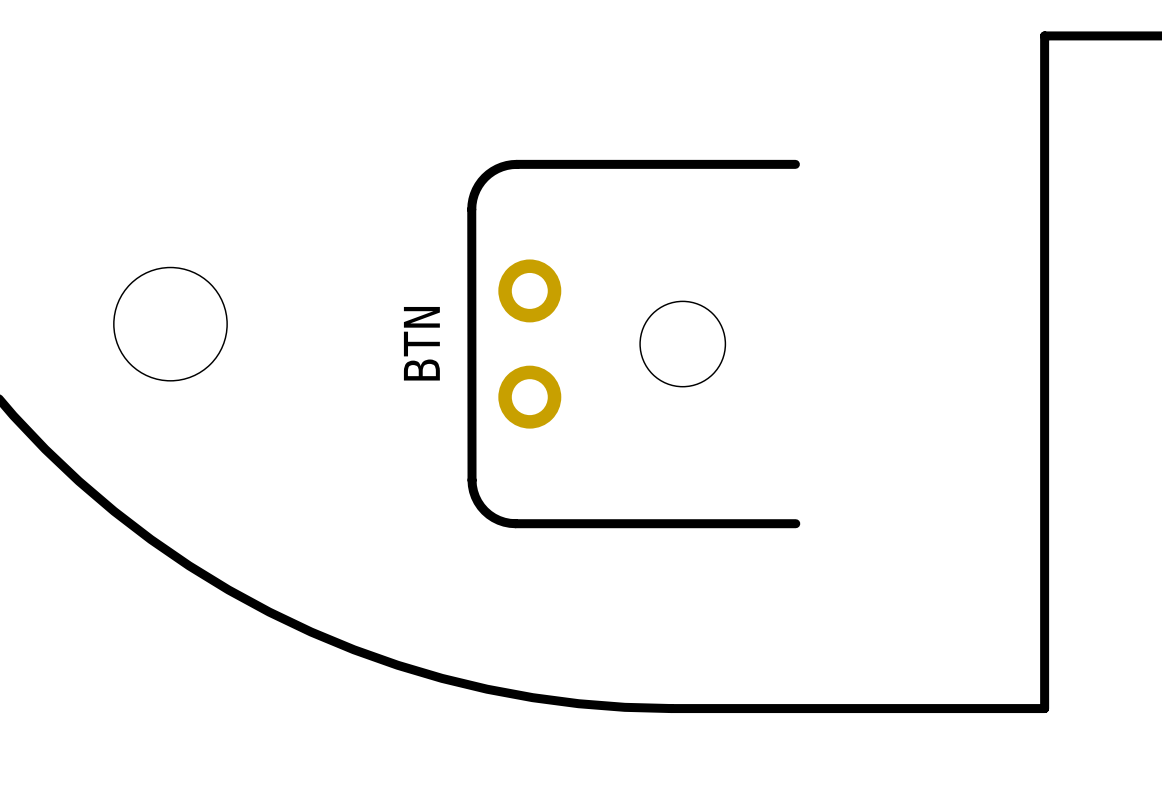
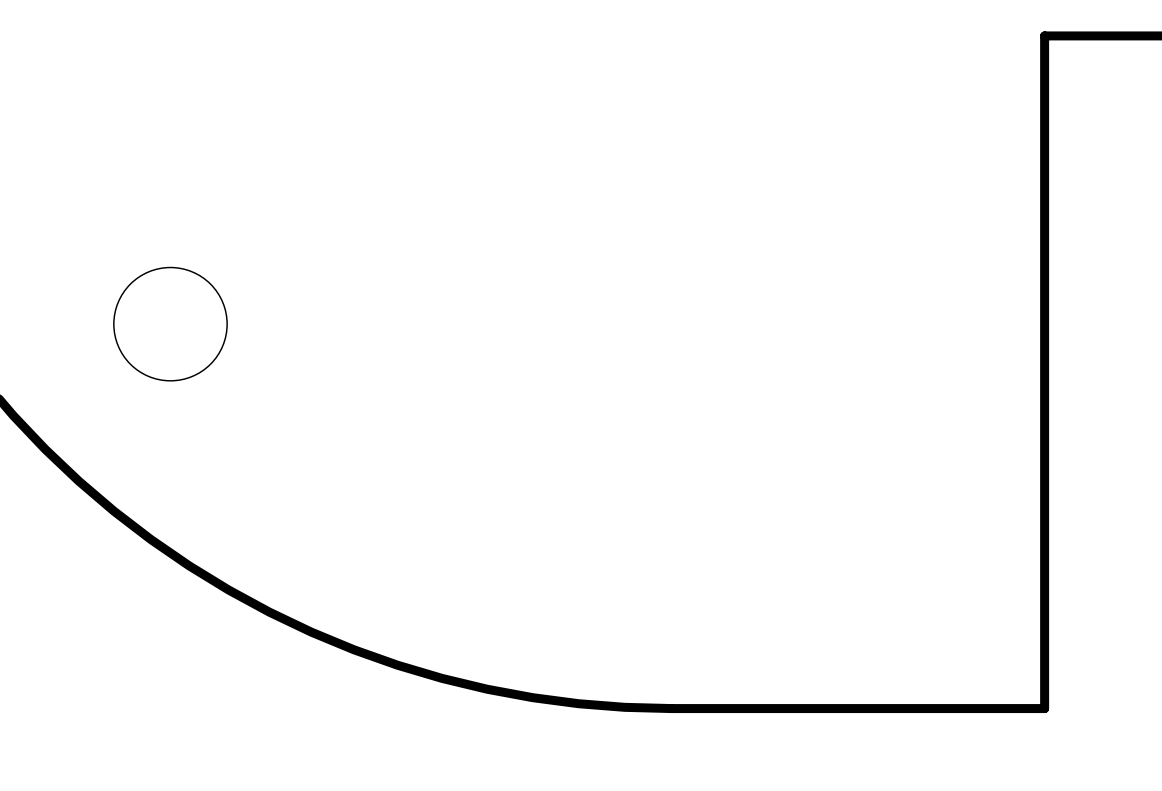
BTN: (633, 344) -> none

